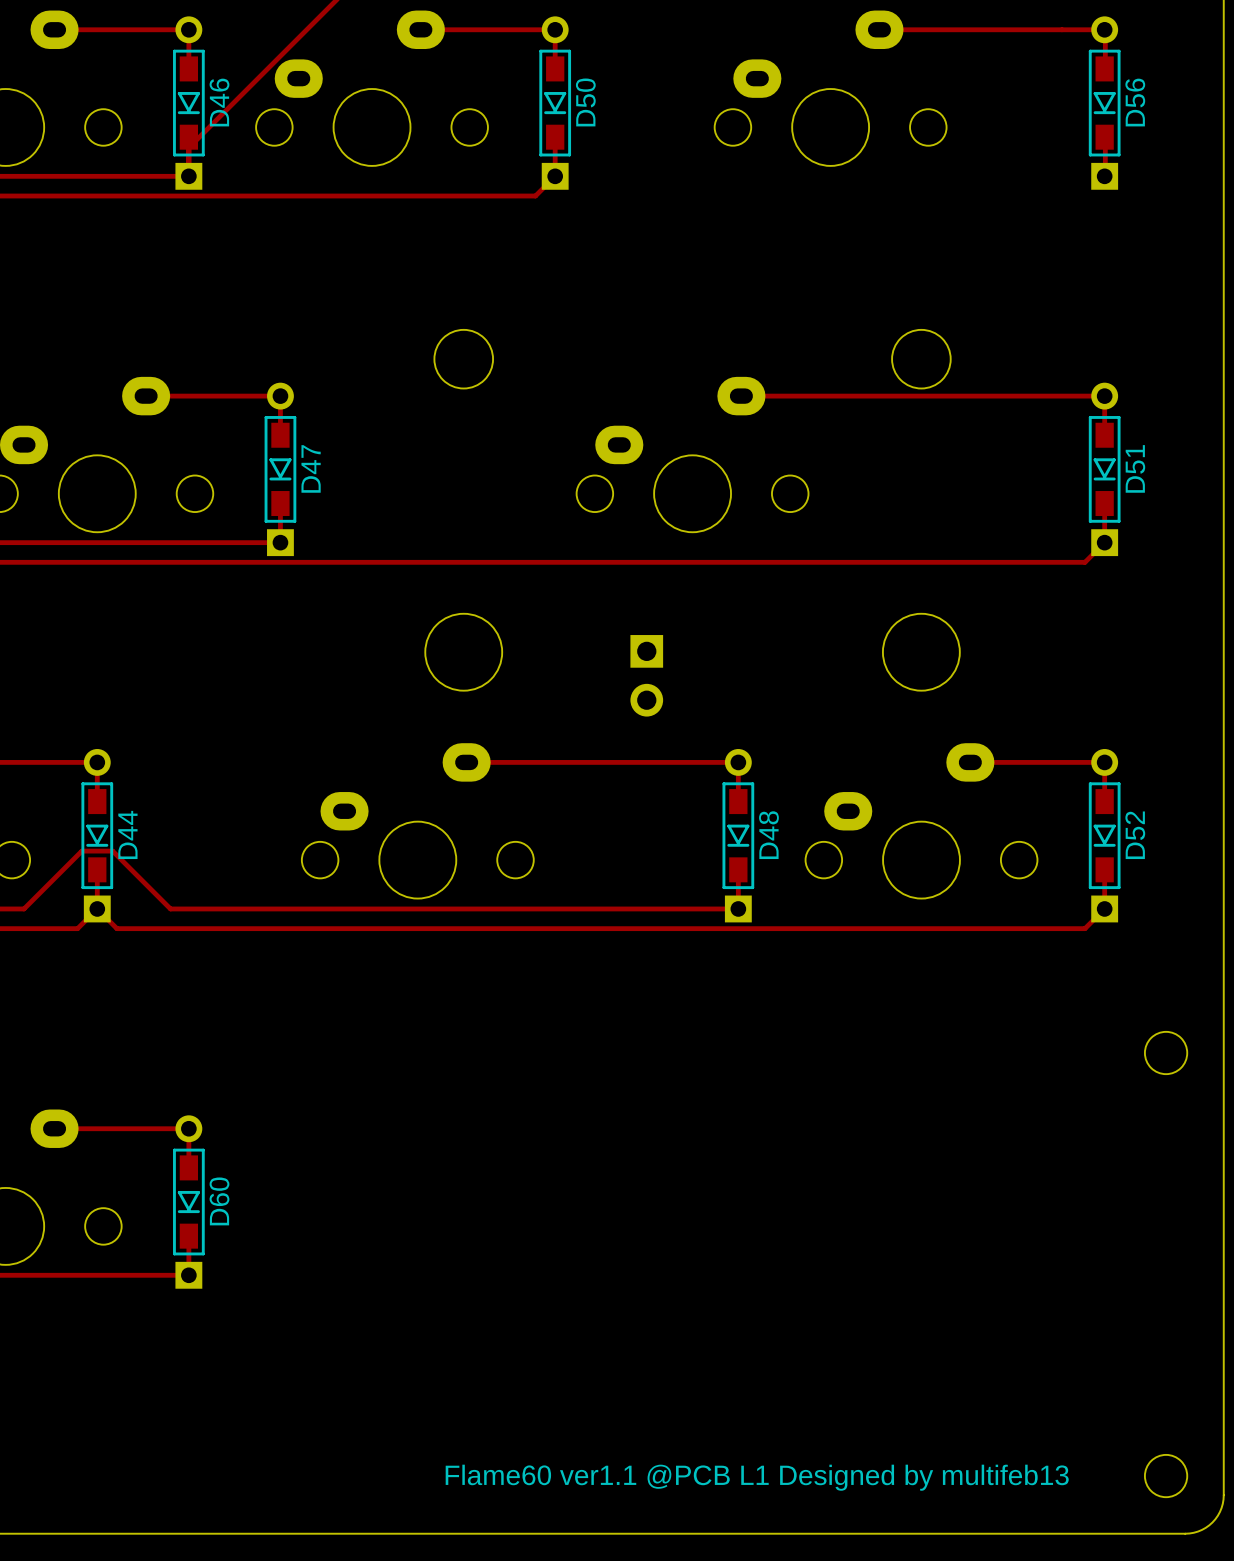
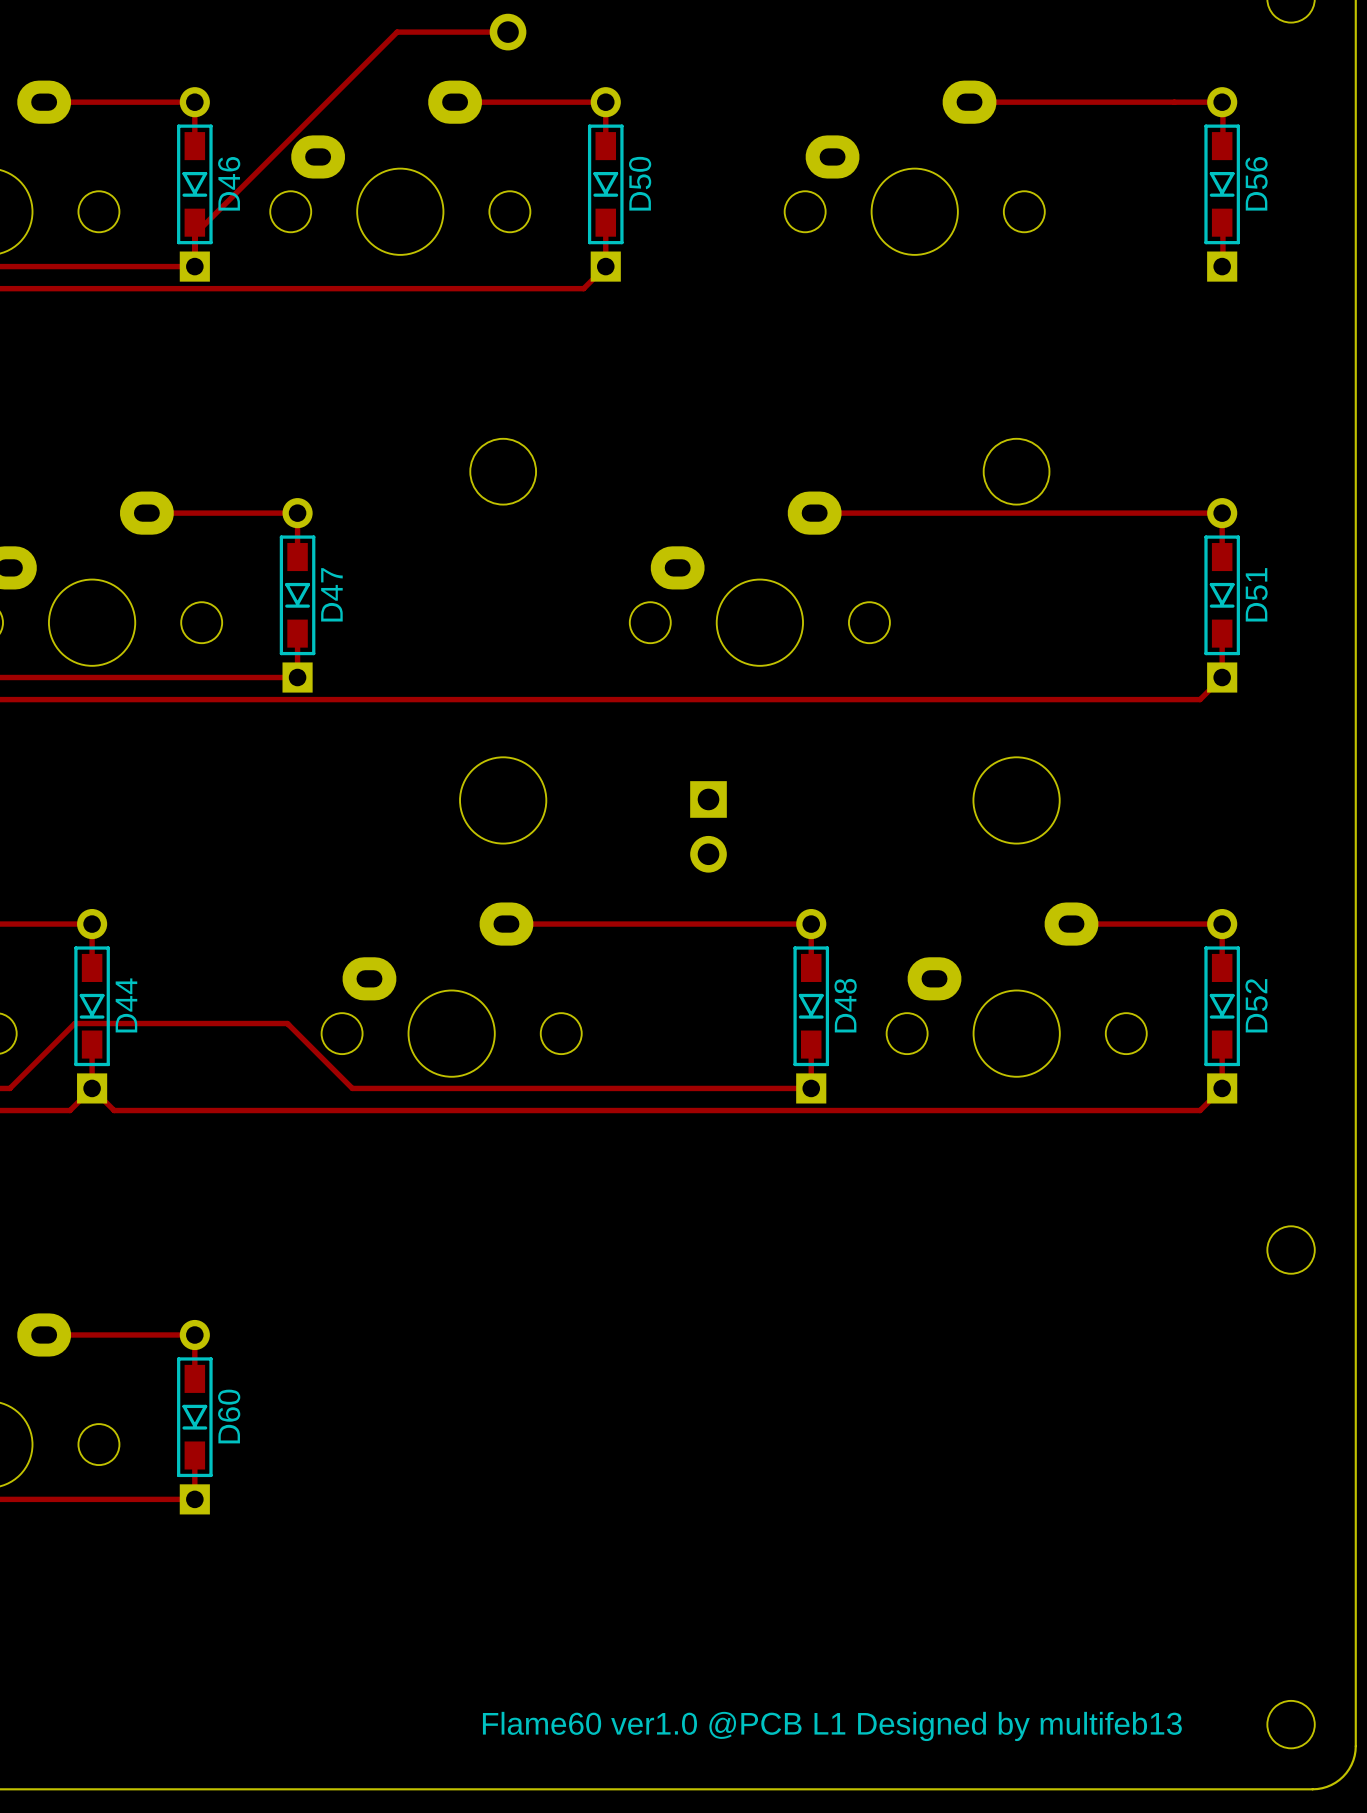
track: (112, 851) (170, 908) (329, 908) -> (109, 1023) (287, 1023) (352, 1088)
text: Flame60 ver1.1 @PCB L1 Designed by multifeb13 (757, 1477) -> Flame60 ver1.0 @PCB L1 Designed by multifeb13 (832, 1726)

